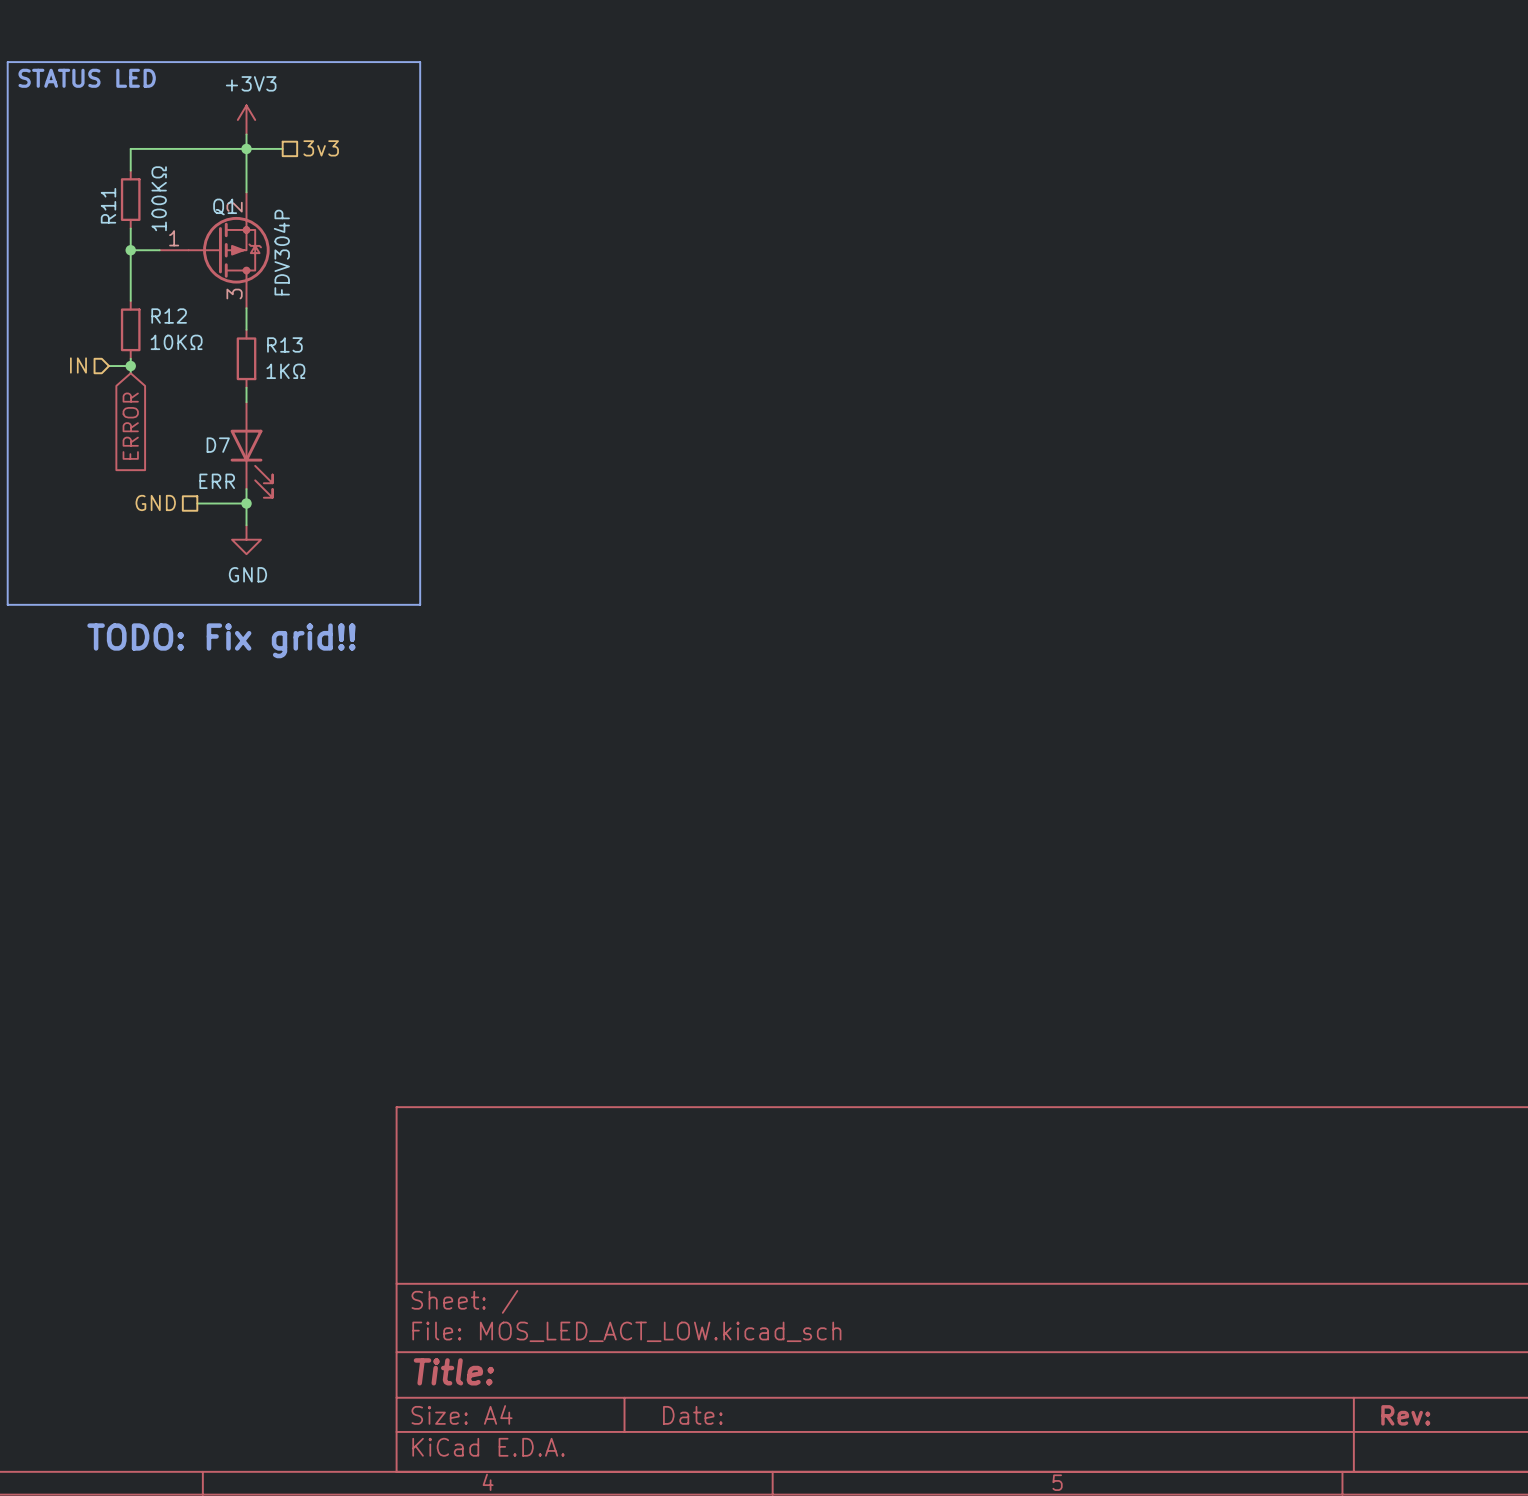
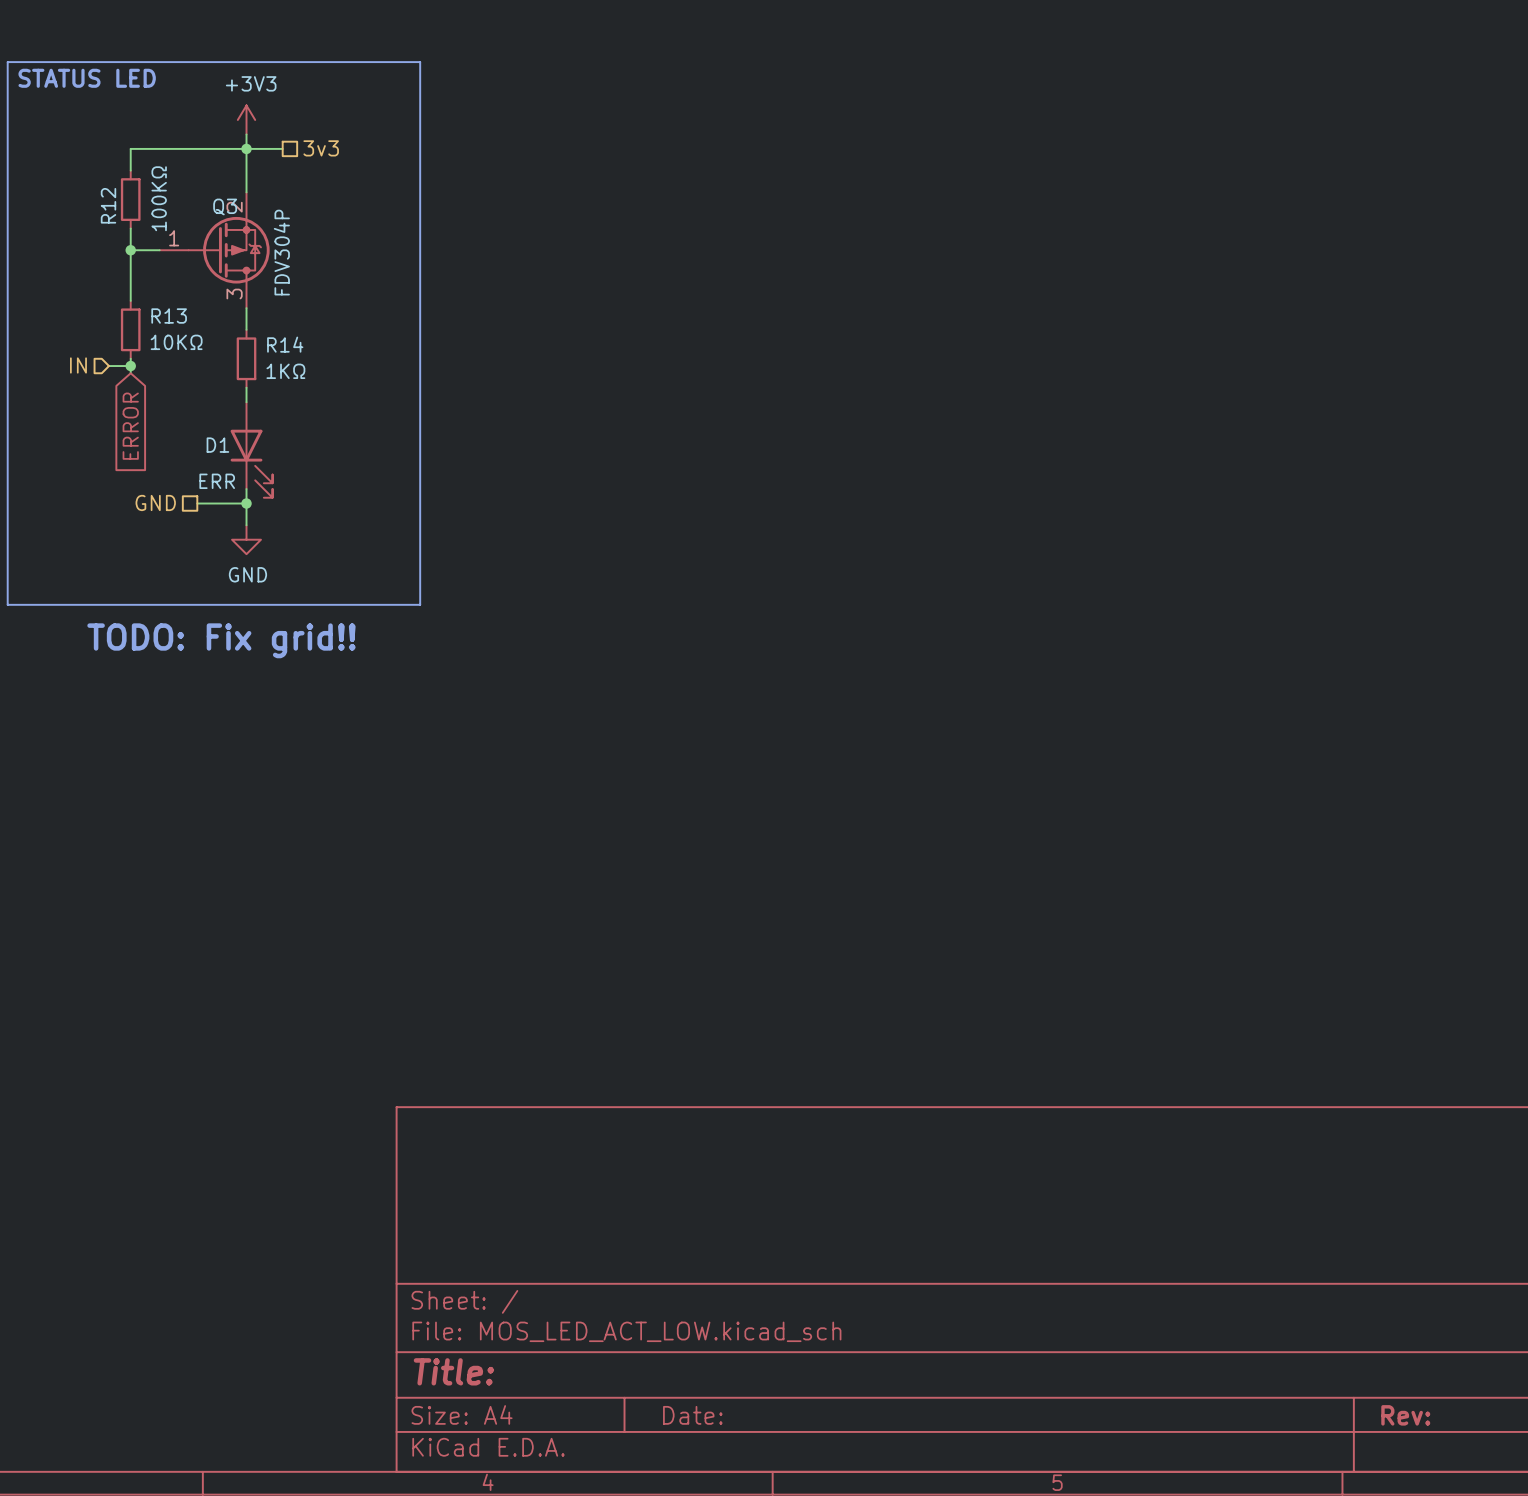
R11 name: R11 (108, 205) -> R12 (108, 205)
Q1 name: Q1 (225, 206) -> Q3 (225, 206)
R12 name: R12 (169, 316) -> R13 (169, 316)
R13 name: R13 (284, 344) -> R14 (285, 344)
D7 name: D7 (218, 445) -> D1 (217, 445)

